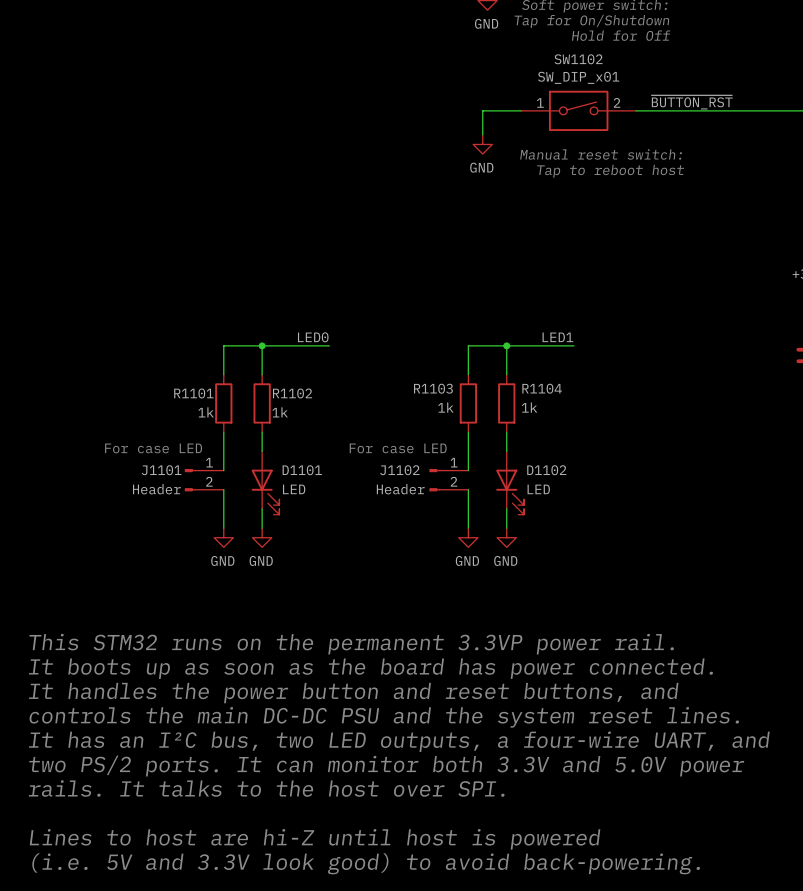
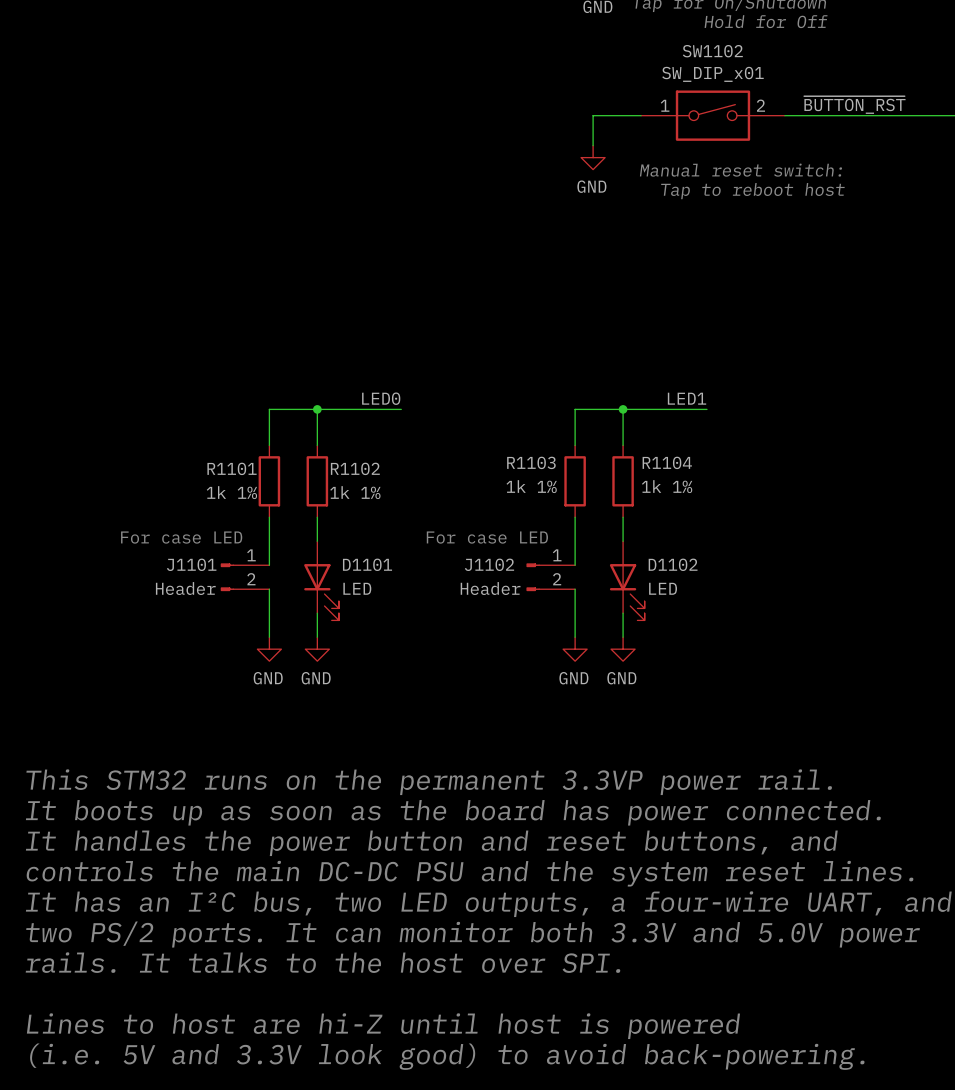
R1103 value: 1k (445, 407) -> 1k 1% (531, 486)
R1104 value: 1k (529, 407) -> 1k 1% (667, 486)
R1101 value: 1k (206, 412) -> 1k 1% (231, 492)
R1102 value: 1k (280, 412) -> 1k 1% (355, 492)

